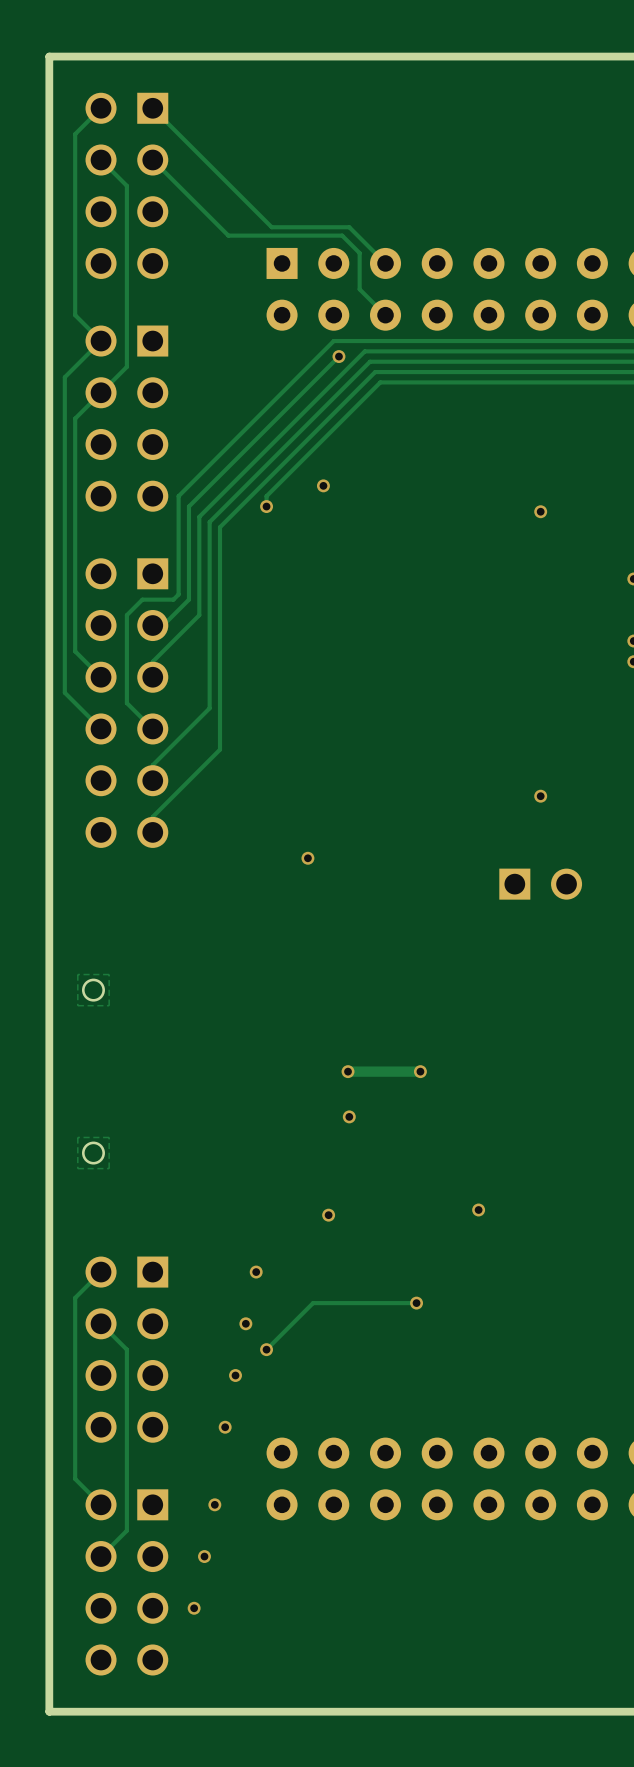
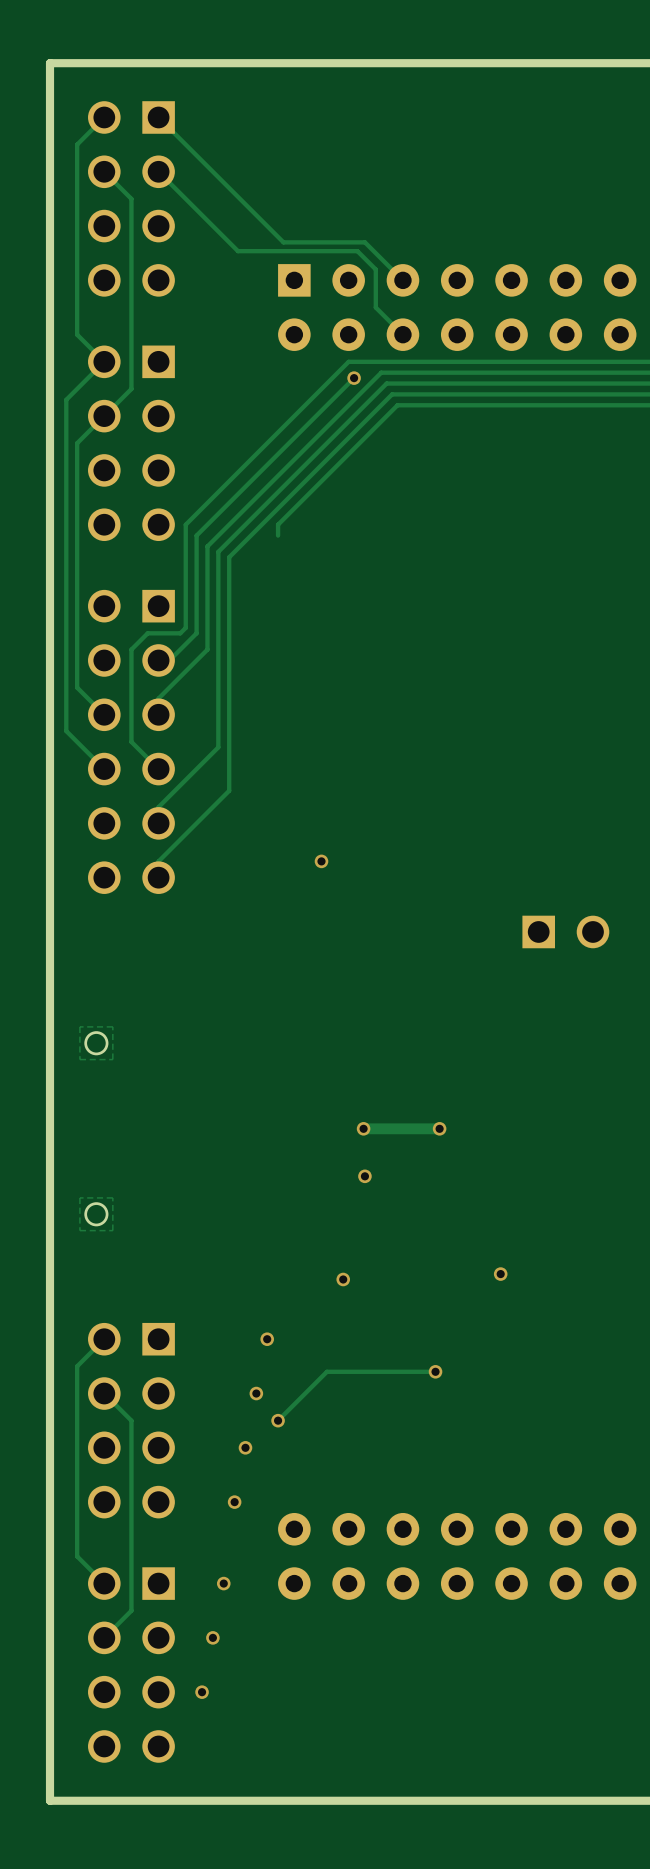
via: (323, 485) -> none
via: (266, 506) -> none
via: (540, 511) -> none
via: (540, 796) -> none
via position: (307, 858) -> (321, 861)

